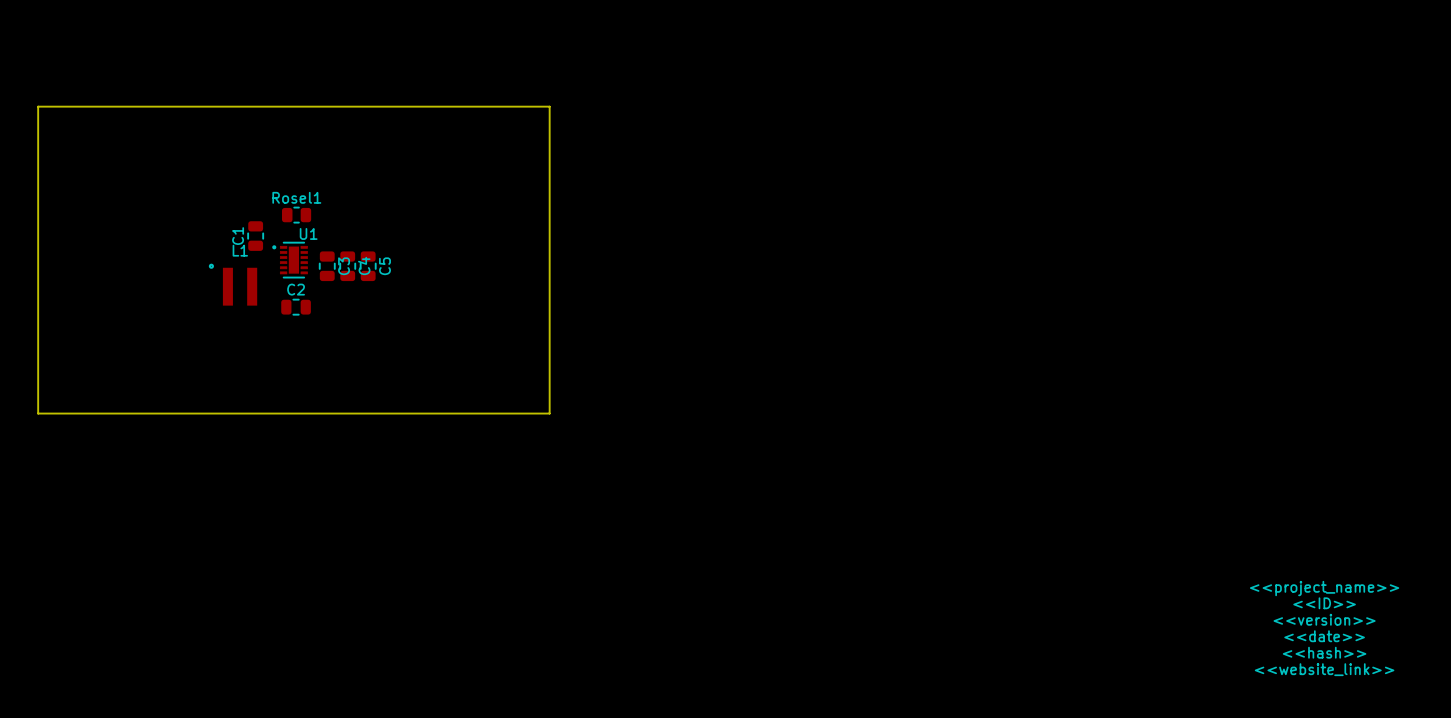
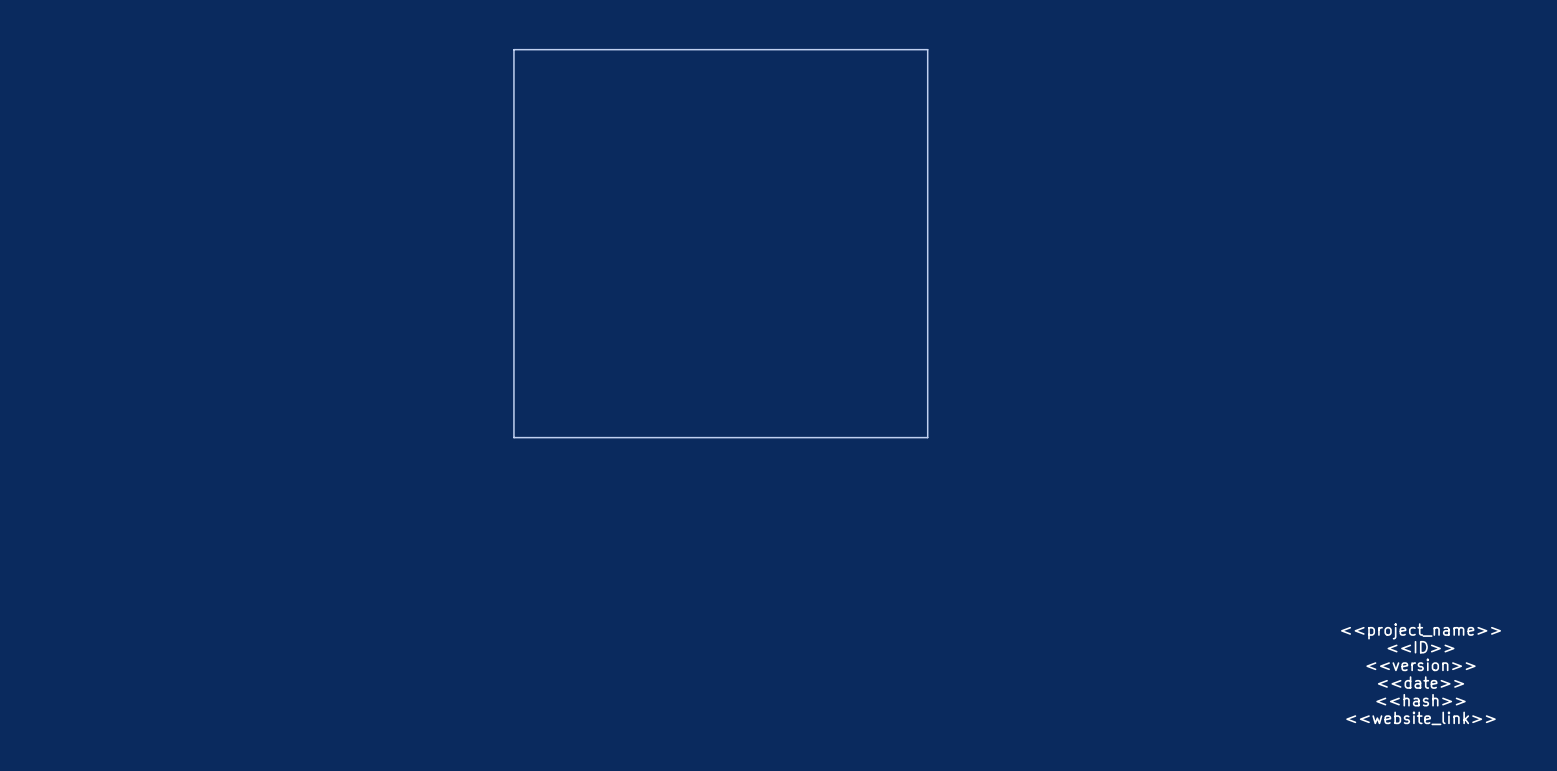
board edge: none -> (513, 49) (927, 49) (927, 437) (513, 437) (513, 49)
board edge: (38, 106) (549, 106) (549, 413) (38, 413) (38, 106) -> none
Rosel1: (296, 215) -> none
C1: (255, 236) -> none
U1: (290, 260) -> none
C3: (327, 266) -> none
C4: (347, 266) -> none
C5: (368, 266) -> none
L1: (233, 284) -> none
C2: (296, 307) -> none

